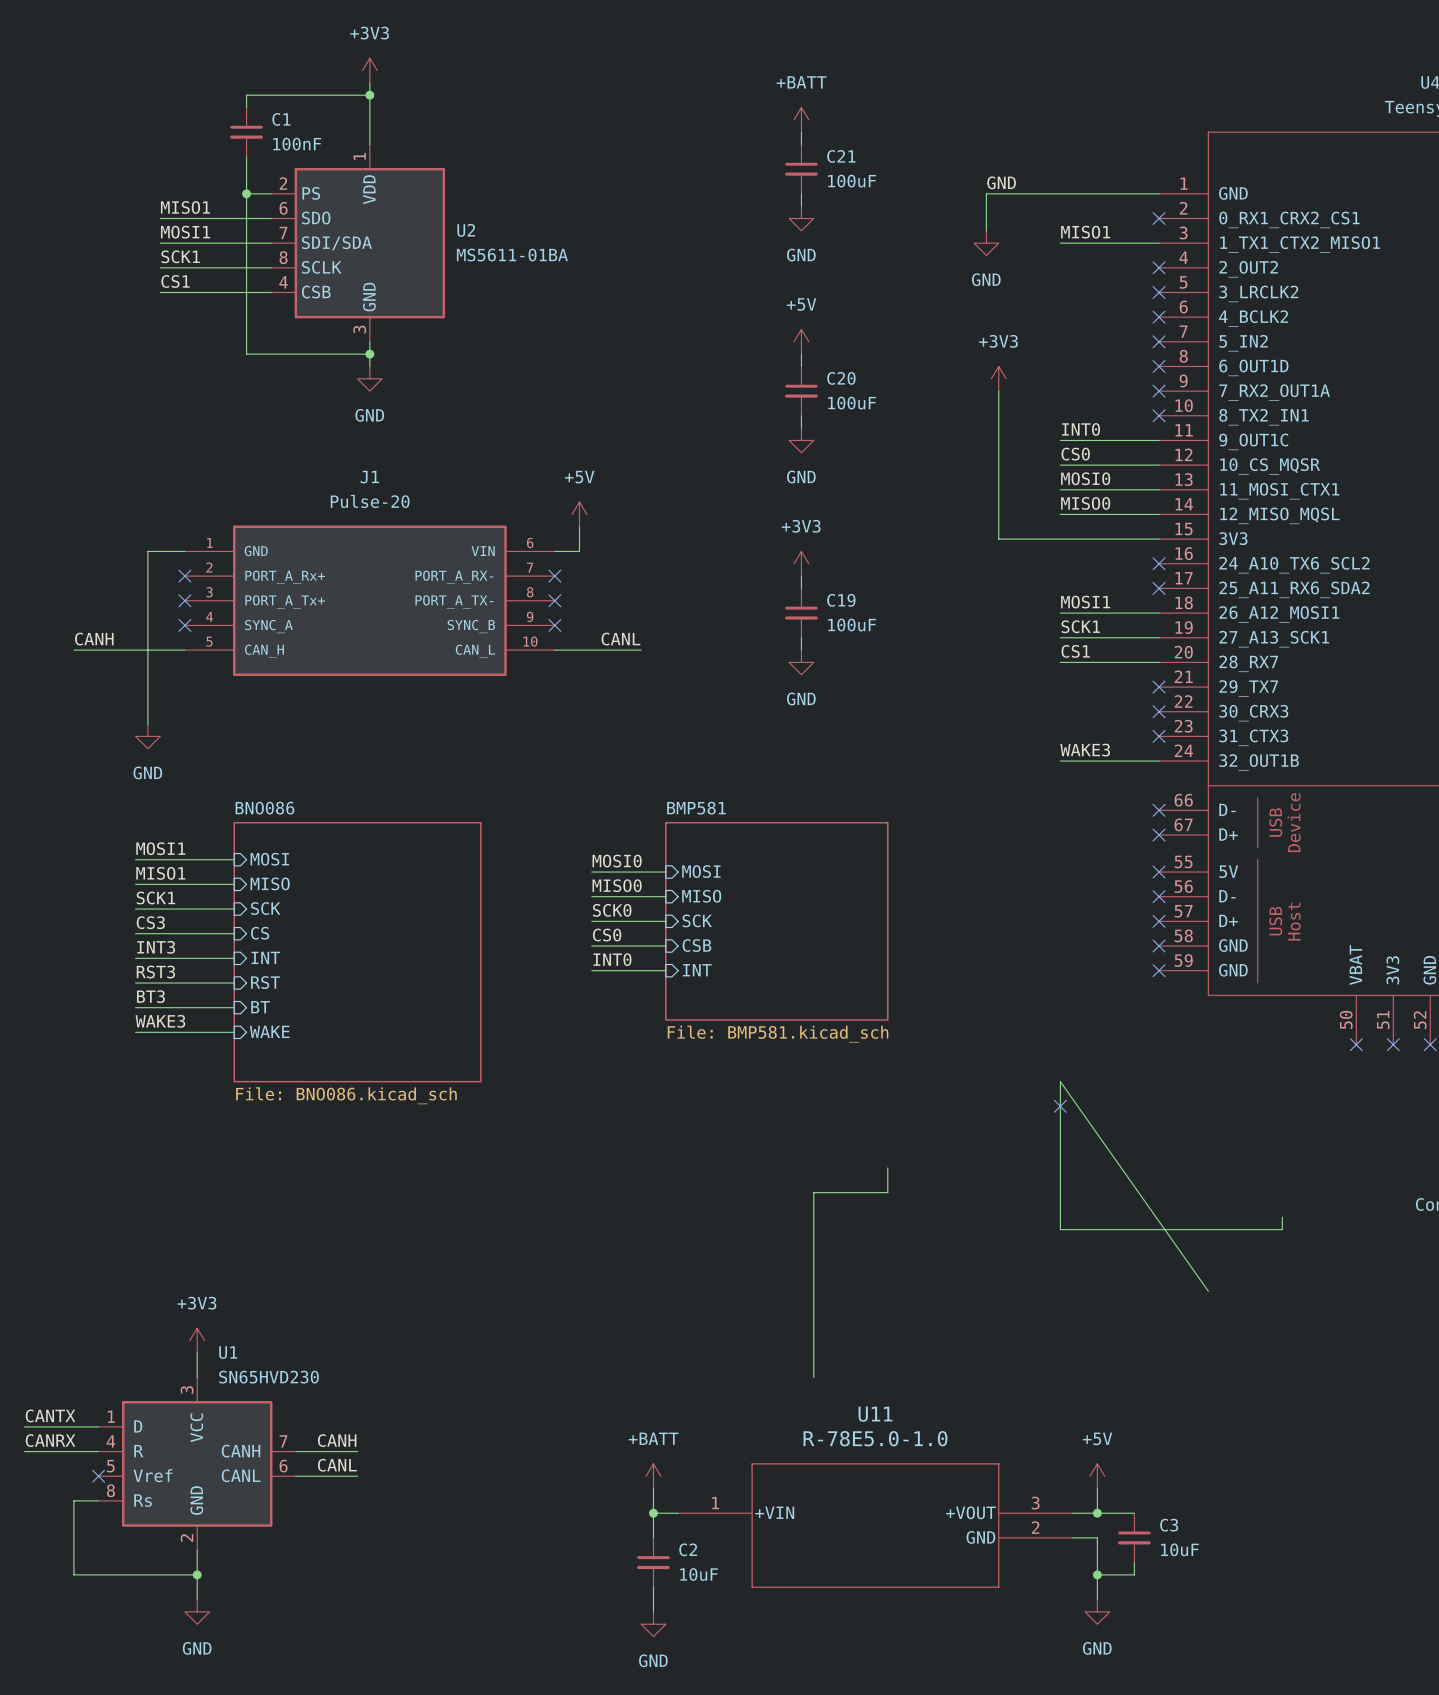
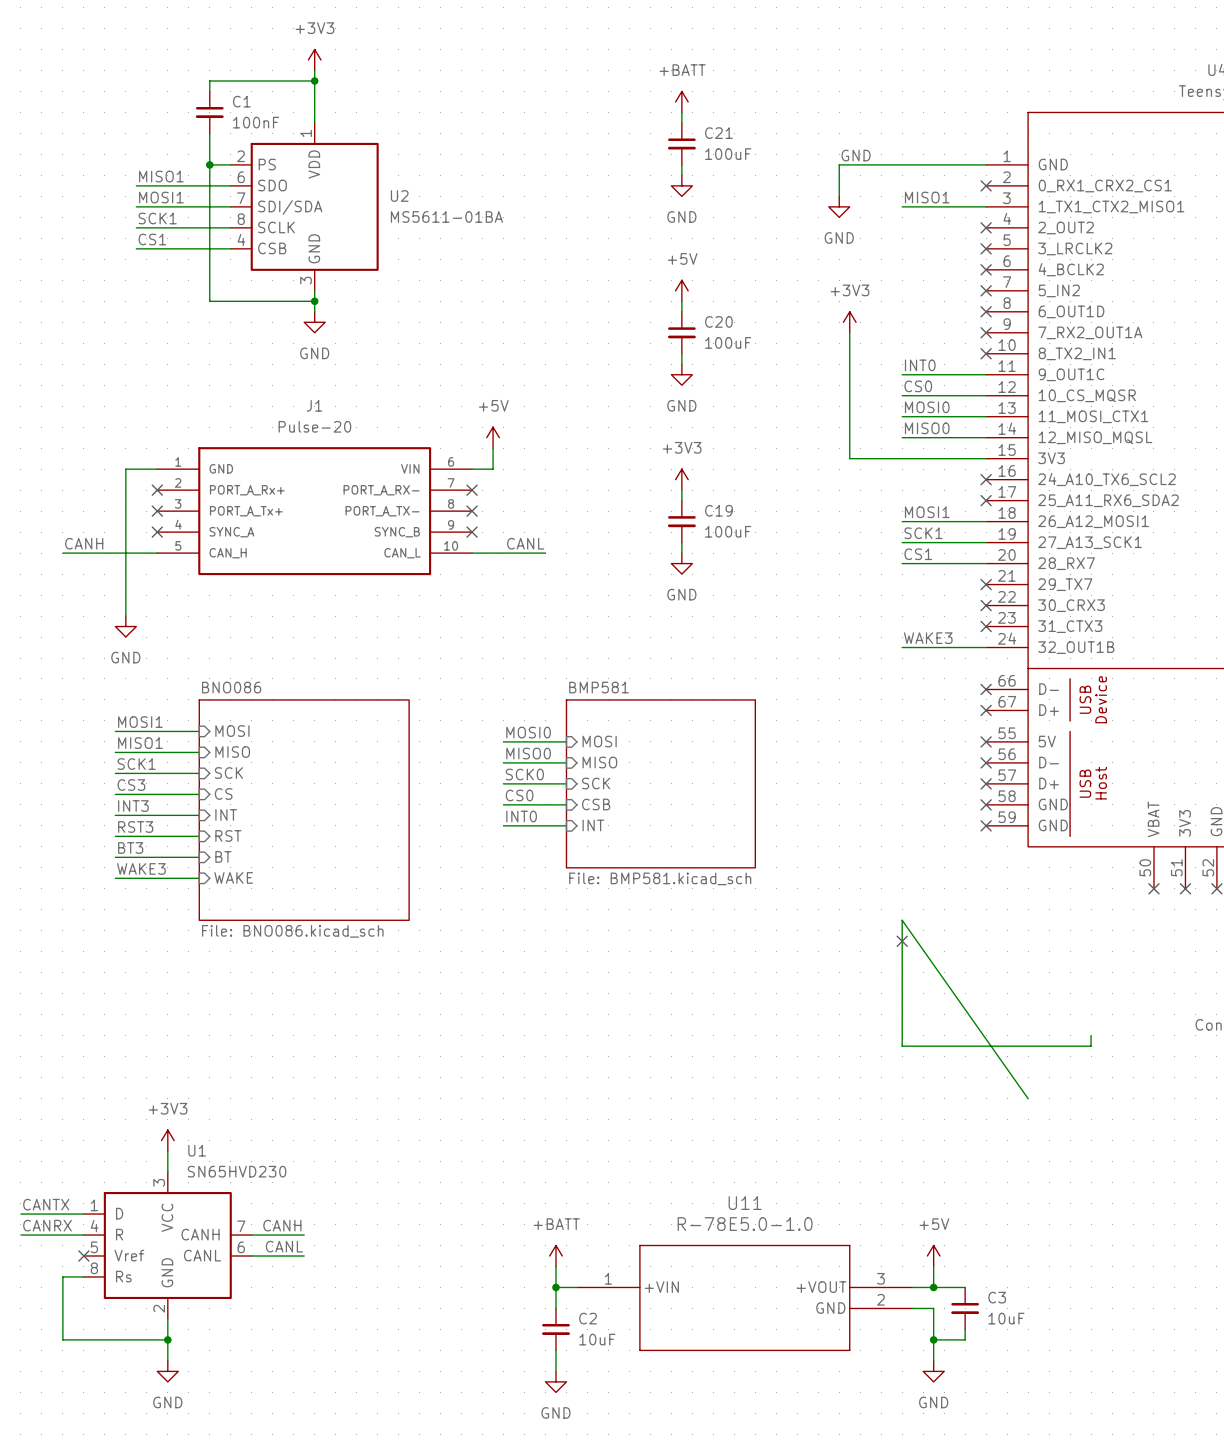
wire: (887, 1167) (887, 1192) (813, 1192) (813, 1377) -> none

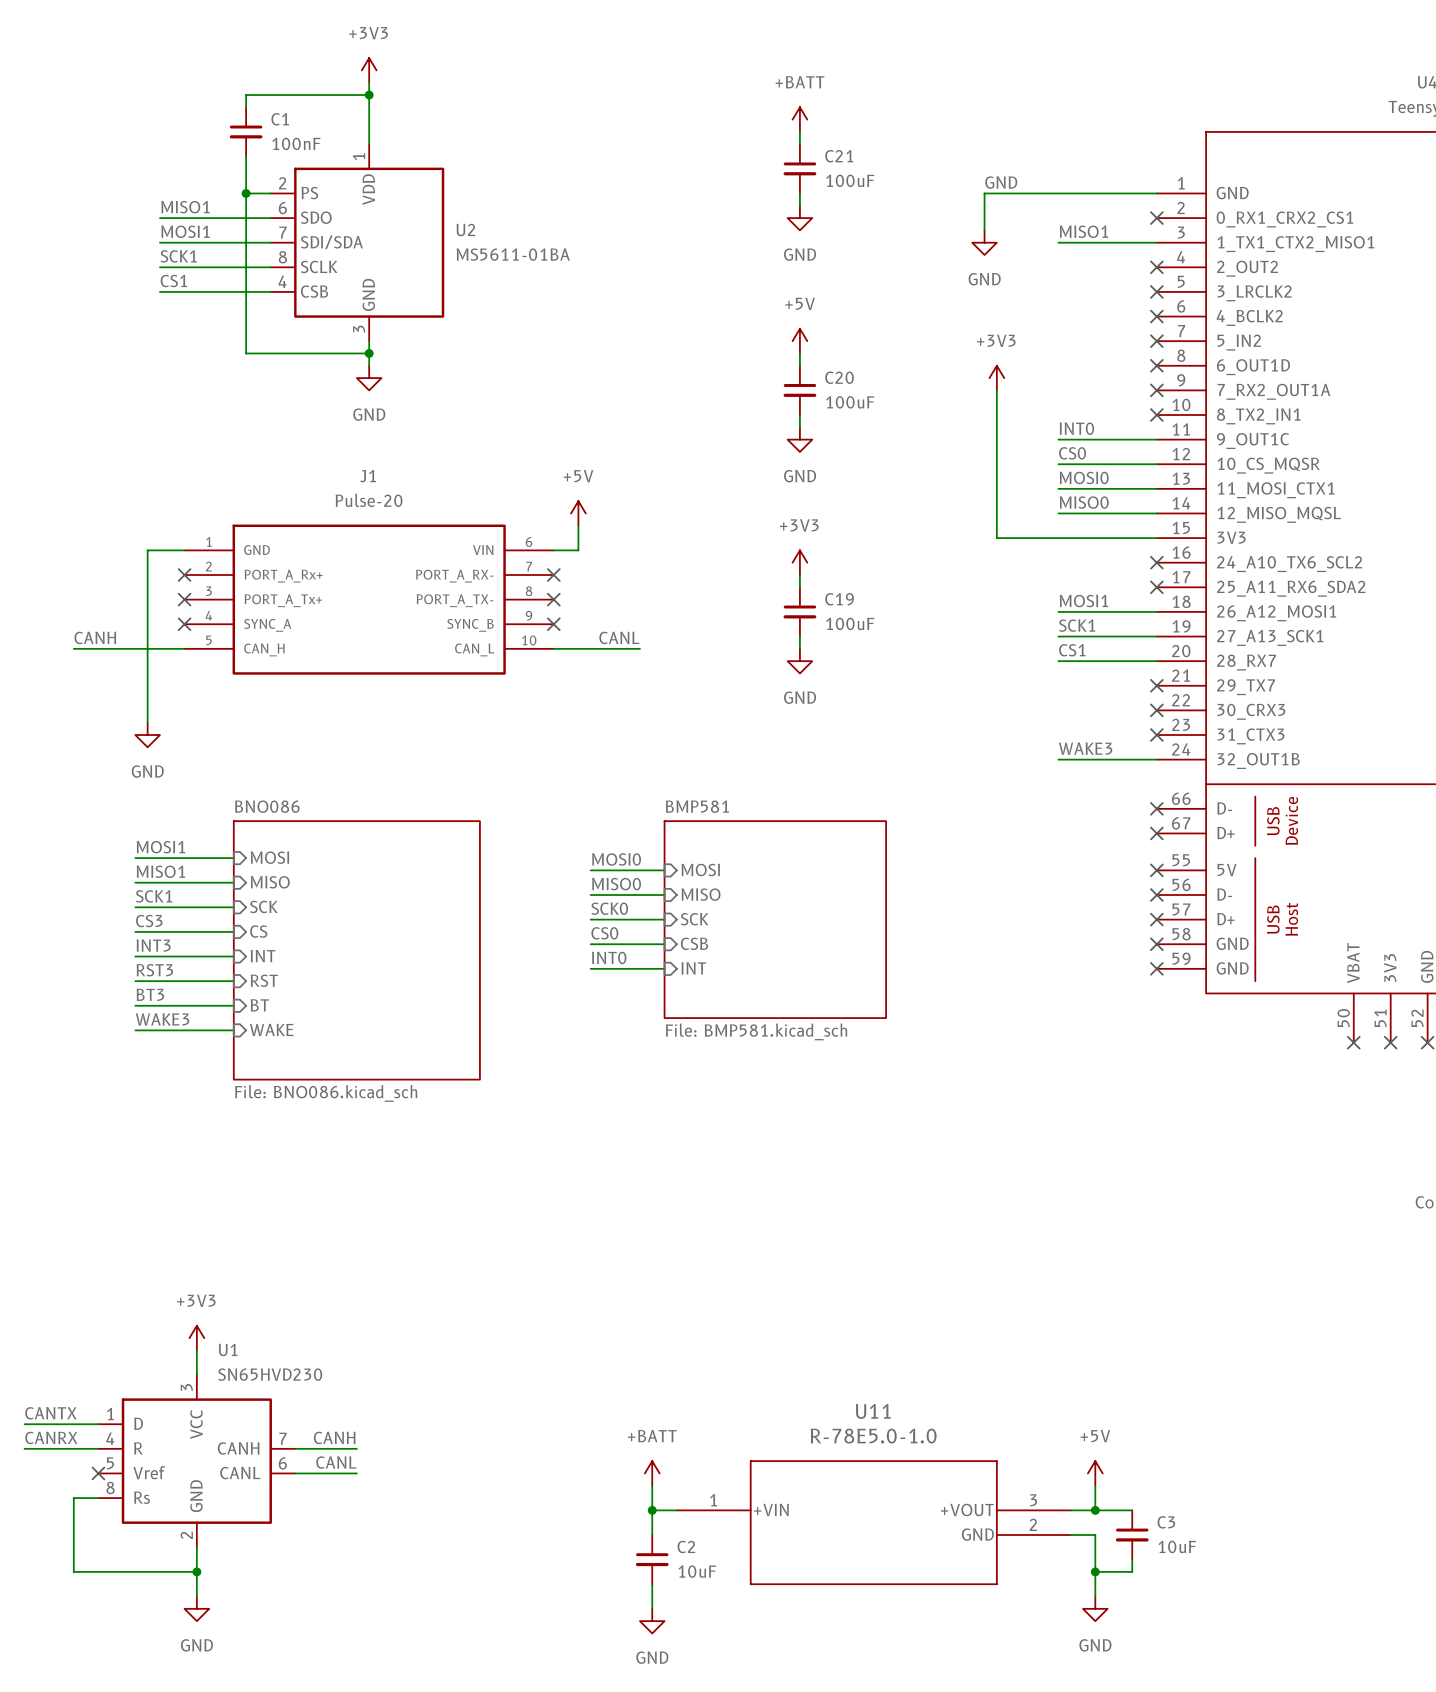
no-connect mark: (902, 941) -> none
wire: (1091, 1035) (1091, 1046) (902, 1046) (902, 920) (1028, 1098) -> none

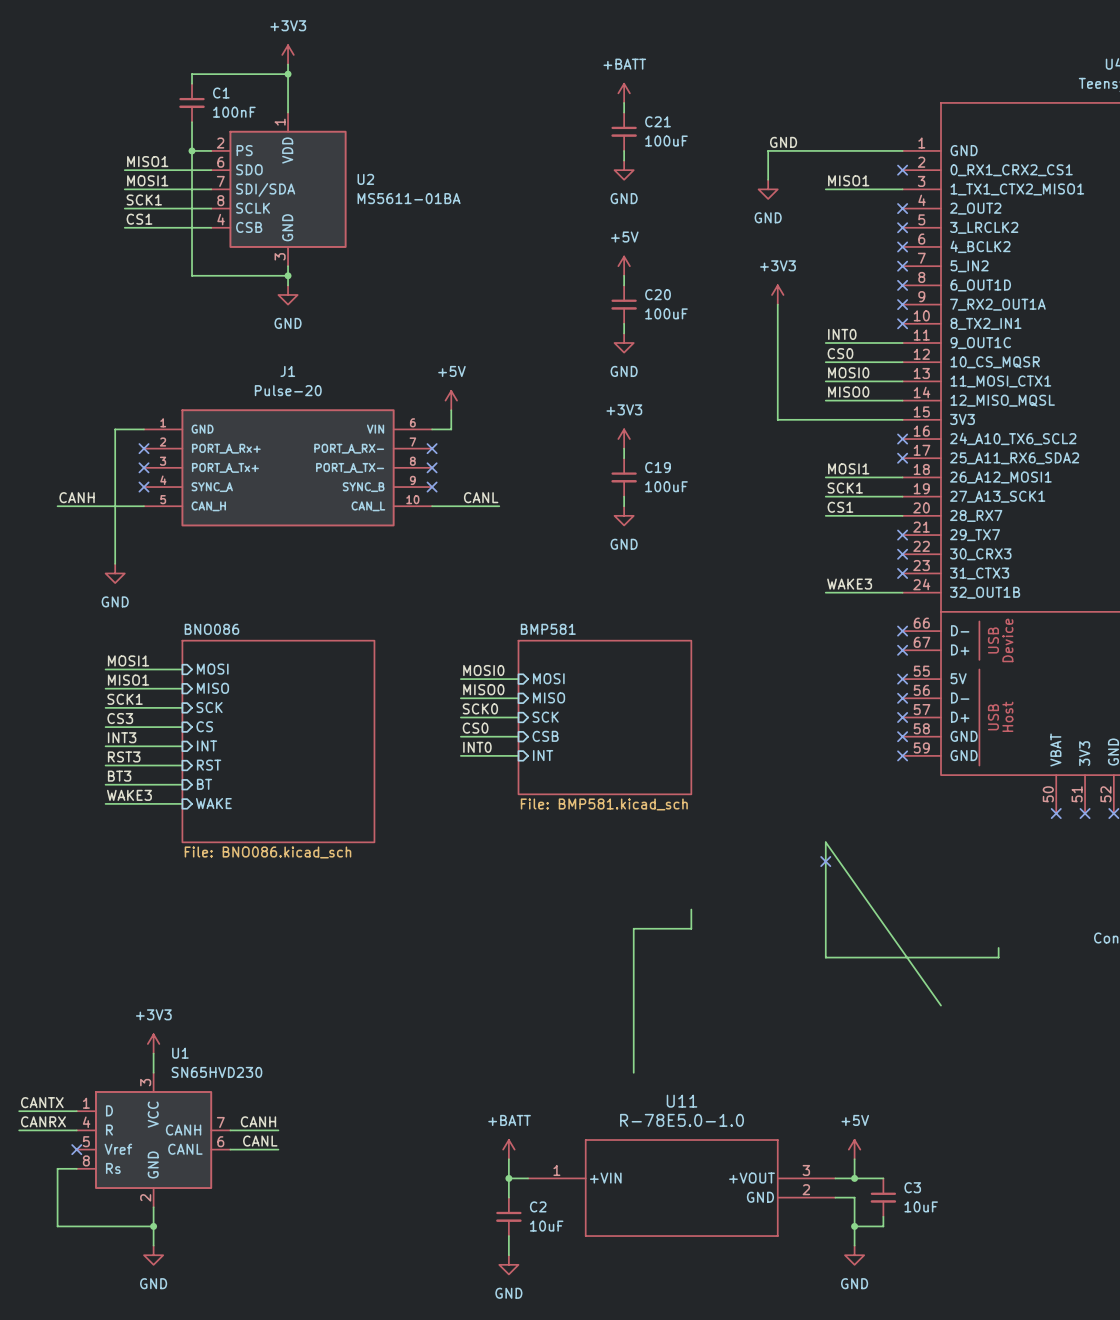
no-connect mark: none -> (825, 861)
wire: none -> (691, 909) (691, 928) (633, 928) (633, 1072)
wire: none -> (998, 947) (998, 957) (825, 957) (825, 842) (941, 1005)

